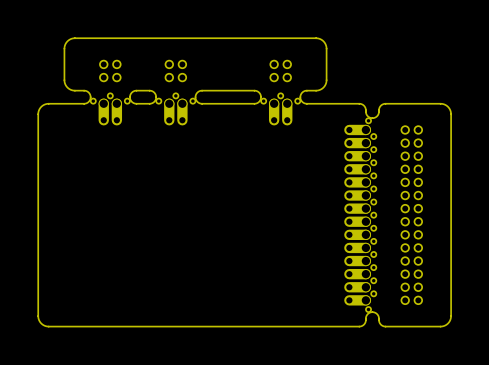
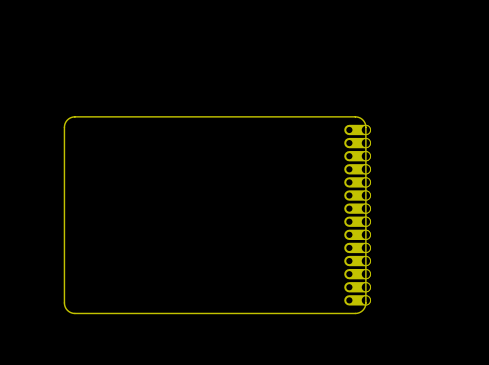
board edge: (316, 38) (74, 38) (67, 41) (64, 48) (65, 84) (72, 90) (86, 91) (90, 97) (84, 103) (46, 104) (38, 111) (38, 316) (41, 323) (48, 326) (359, 326) (364, 323) (367, 314) (372, 312) (377, 314) (380, 323) (384, 326) (440, 326) (448, 323) (451, 316) (450, 110) (441, 103) (384, 103) (380, 106) (377, 115) (372, 118) (367, 115) (364, 106) (360, 103) (304, 103) (300, 98) (302, 92) (320, 89) (326, 81) (326, 46) (322, 40) (316, 38) -> none
part: (110, 70) -> none
part: (175, 70) -> none
part: (280, 70) -> none
board edge: (149, 90) (133, 91) (130, 95) (130, 100) (135, 103) (152, 103) (156, 95) (149, 90) -> none
board edge: (254, 90) (201, 90) (196, 93) (195, 97) (201, 103) (255, 103) (259, 101) (261, 96) (259, 92) (254, 90) -> none
part: (110, 98) -> none
part: (175, 98) -> none
part: (280, 98) -> none
part: (103, 112) -> none
part: (116, 112) -> none
part: (169, 112) -> none
part: (182, 112) -> none
part: (274, 112) -> none
part: (287, 112) -> none
board edge: none -> (355, 116) (69, 118) (64, 127) (65, 308) (74, 313) (360, 312) (365, 302) (365, 127) (362, 119) (355, 116)
part: (371, 215) -> none
part: (411, 215) -> none

